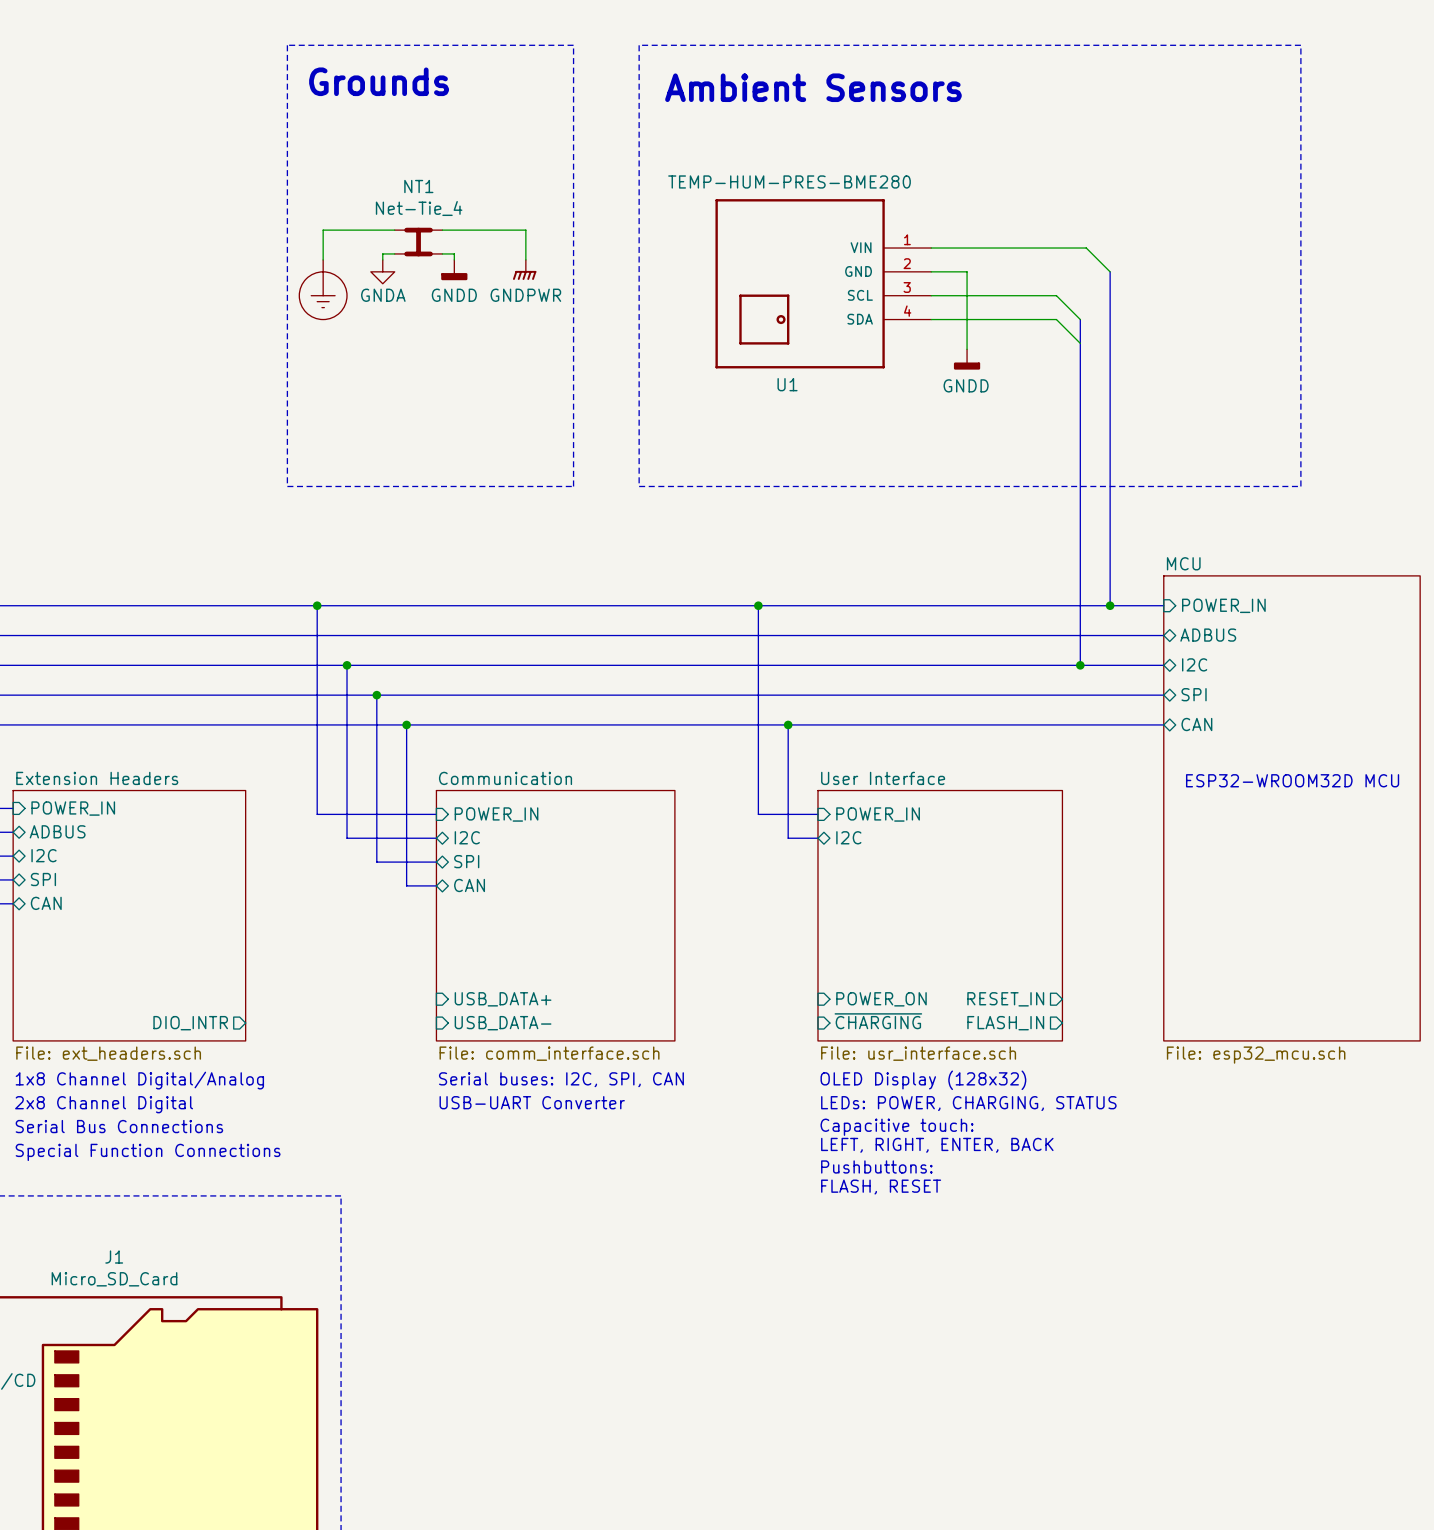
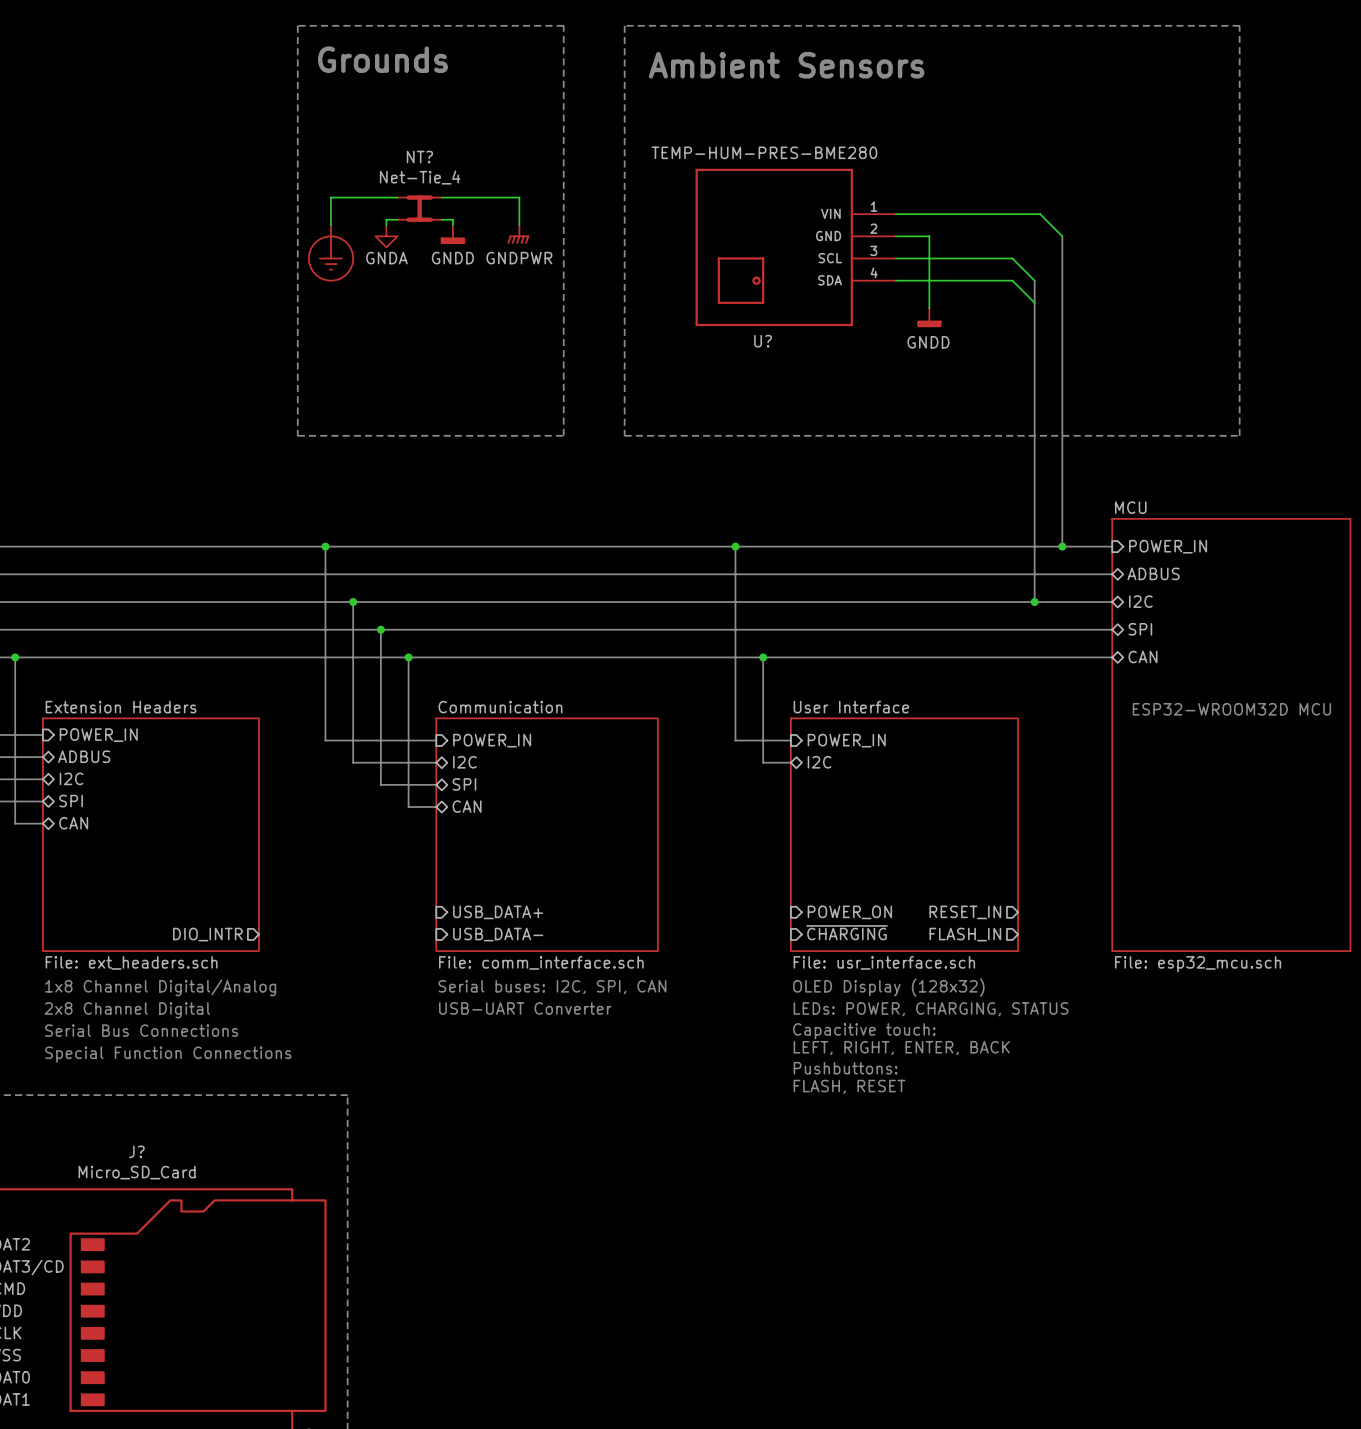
NT1 name: NT1 (418, 186) -> NT? (419, 157)
U1 name: U1 (787, 384) -> U? (763, 341)
J1 name: J1 (114, 1257) -> J? (136, 1151)

